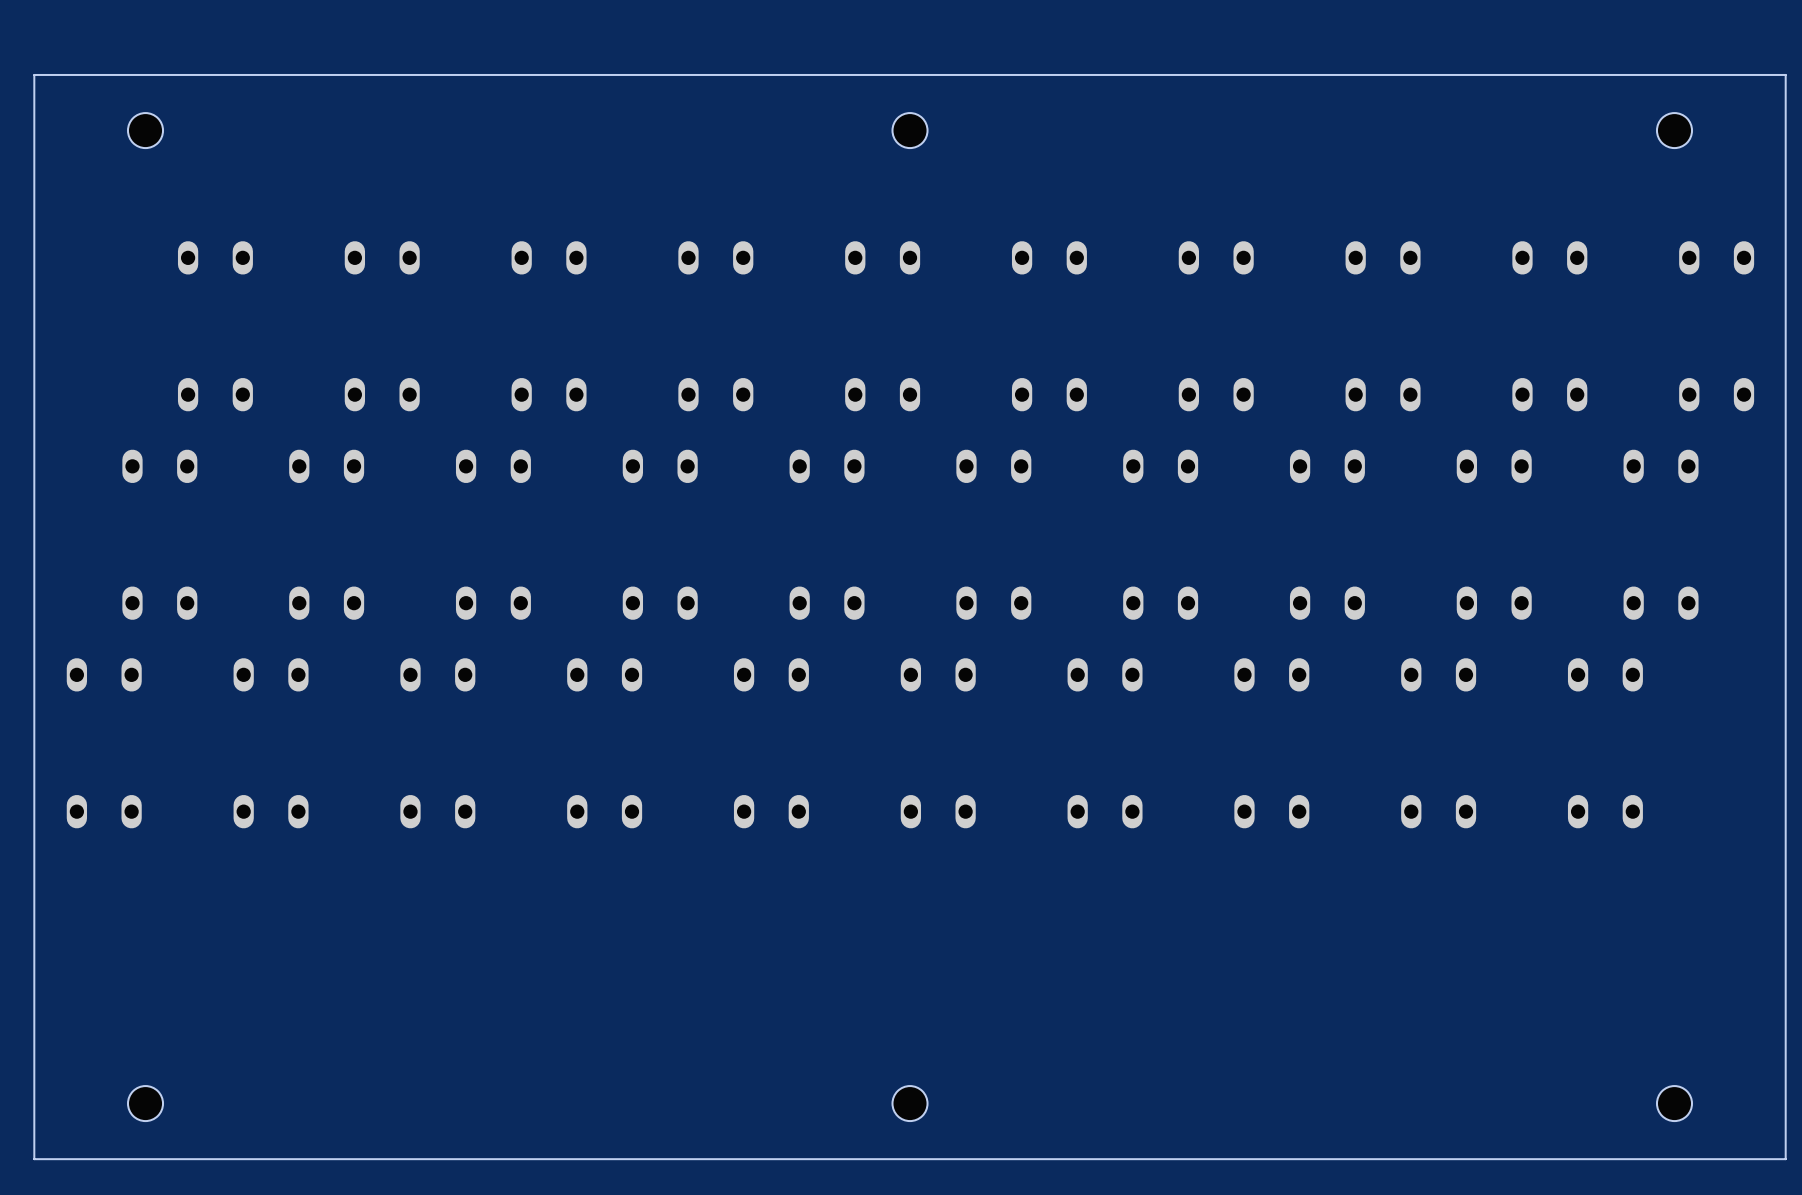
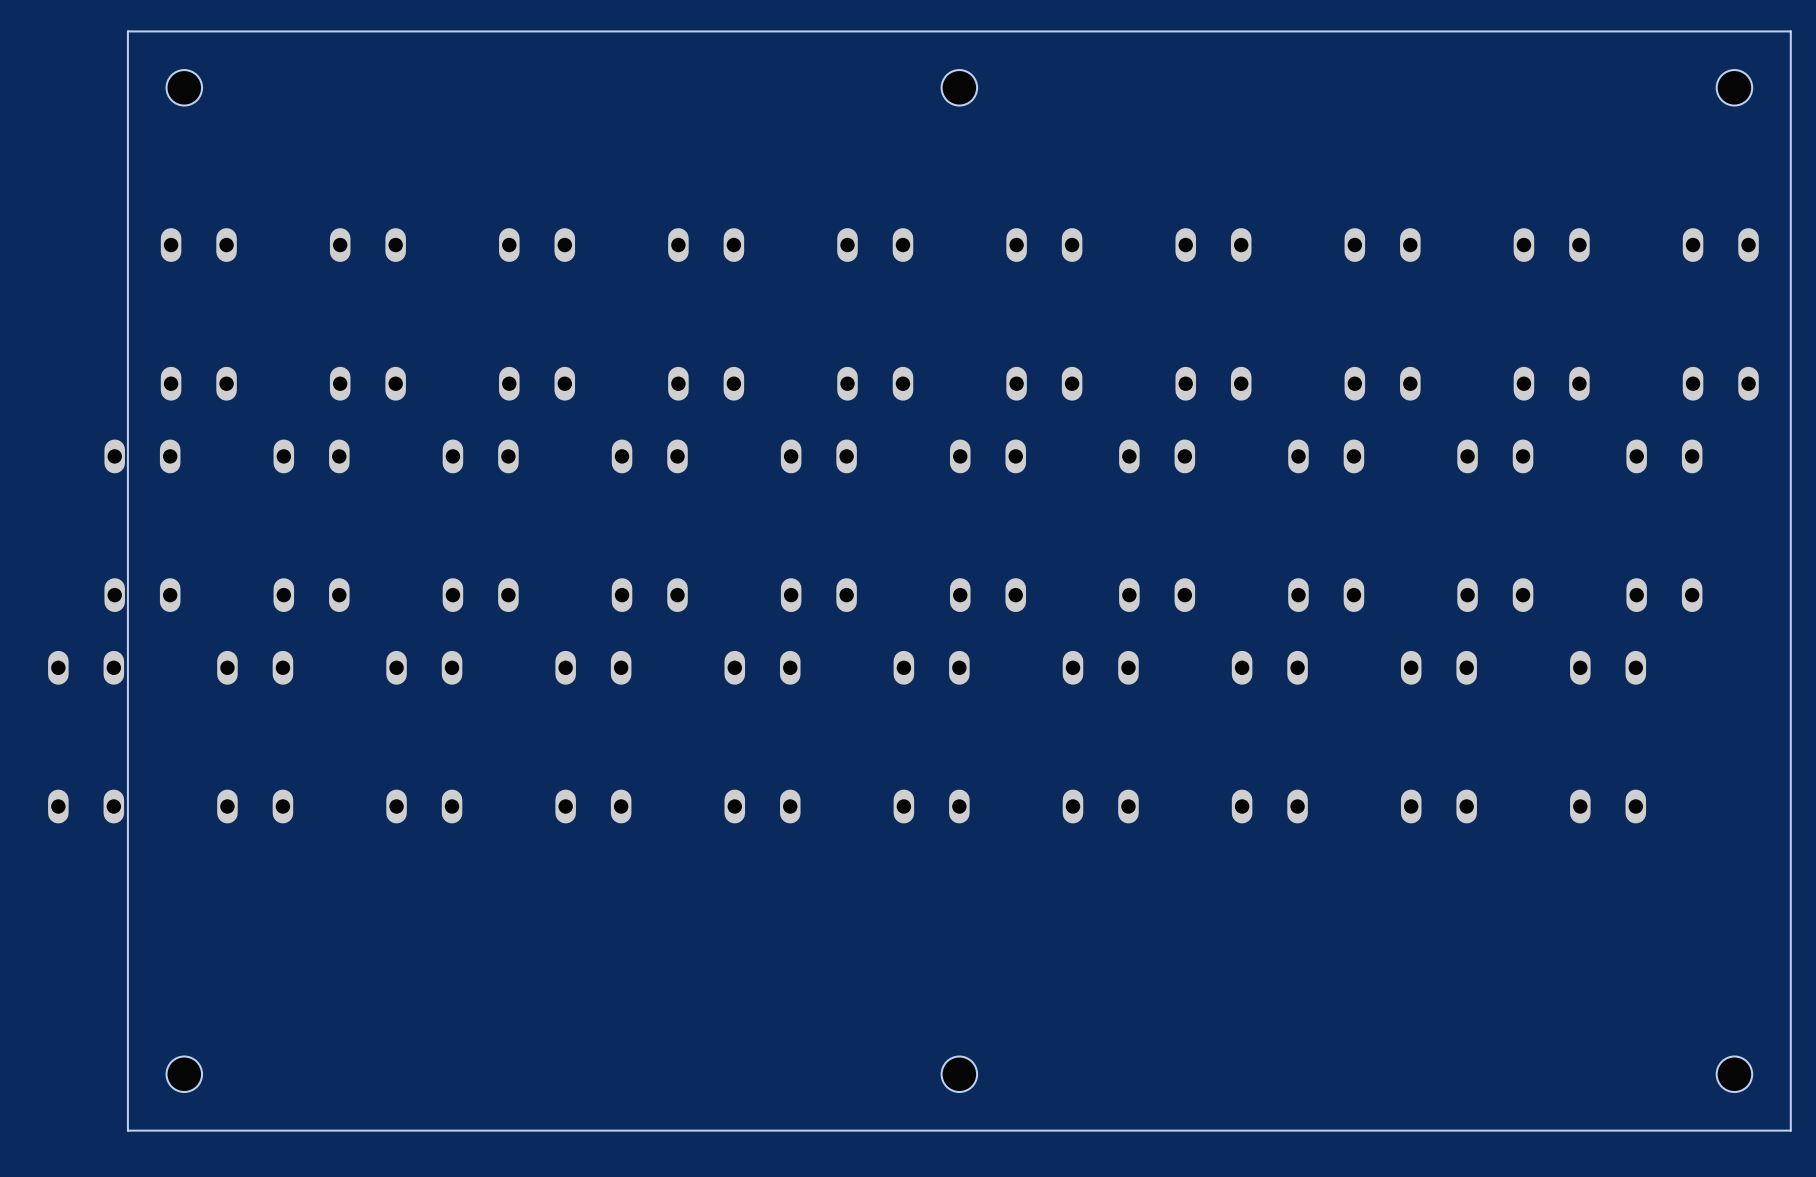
board edge: (1785, 74) (34, 74) (34, 1159) (1785, 1159) (1785, 1131) -> (1790, 59) (1790, 31) (127, 31) (127, 1130) (1790, 1130)
part position: (145, 130) -> (184, 87)
part position: (910, 130) -> (959, 87)
part position: (1674, 130) -> (1734, 87)
part position: (145, 1103) -> (184, 1074)
part position: (910, 1103) -> (959, 1074)
part position: (1674, 1103) -> (1734, 1074)

